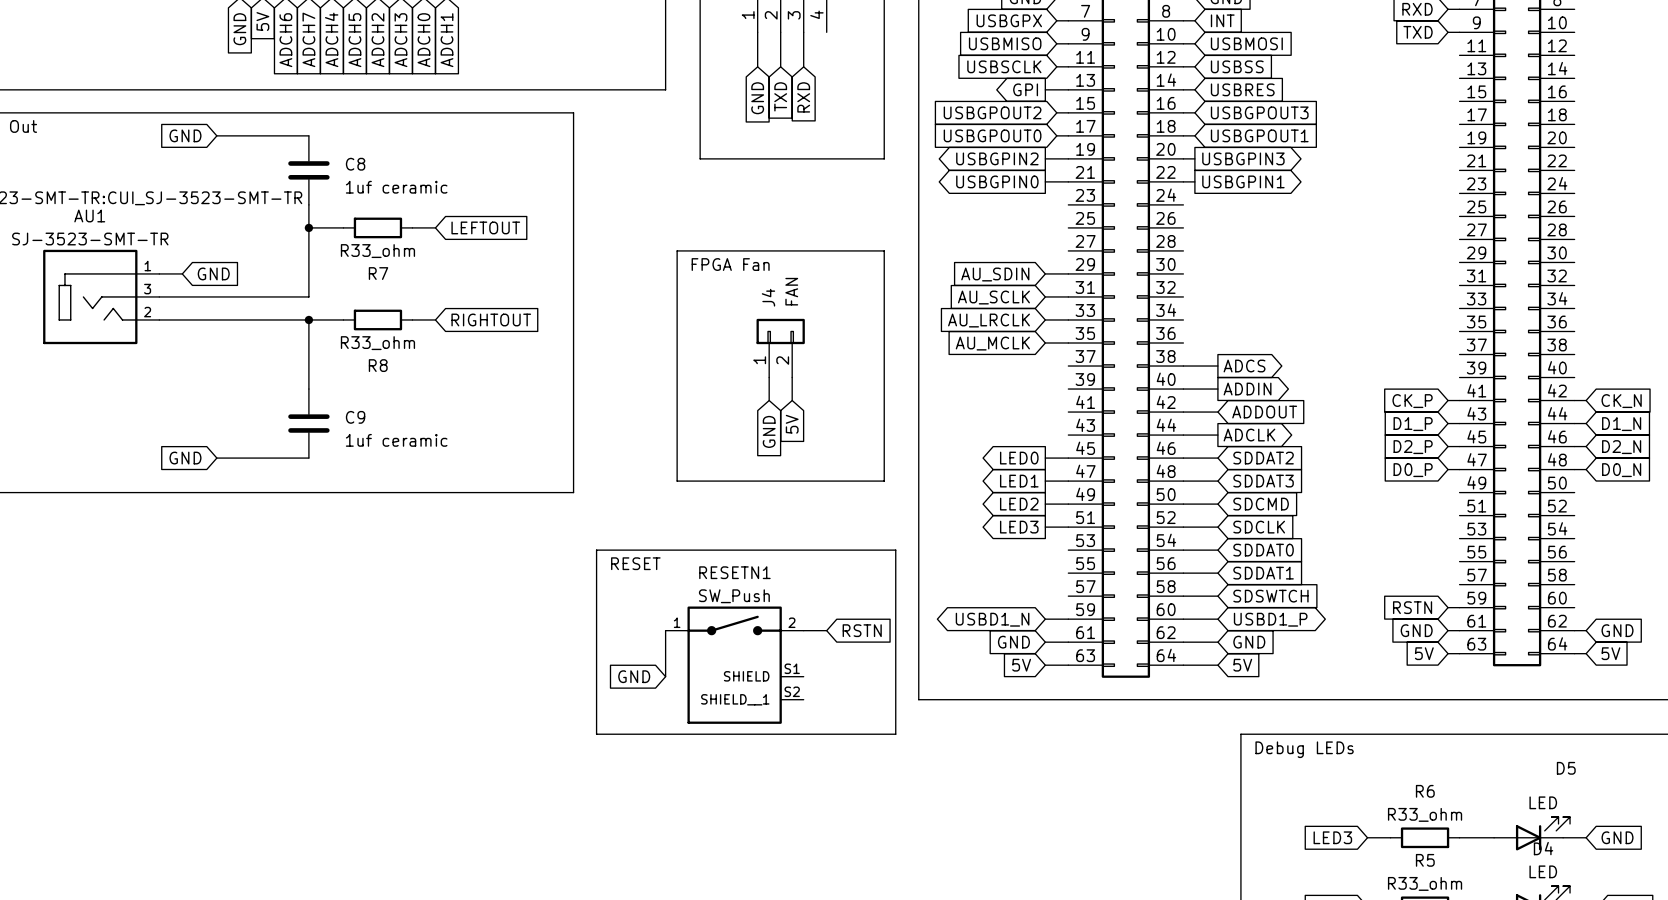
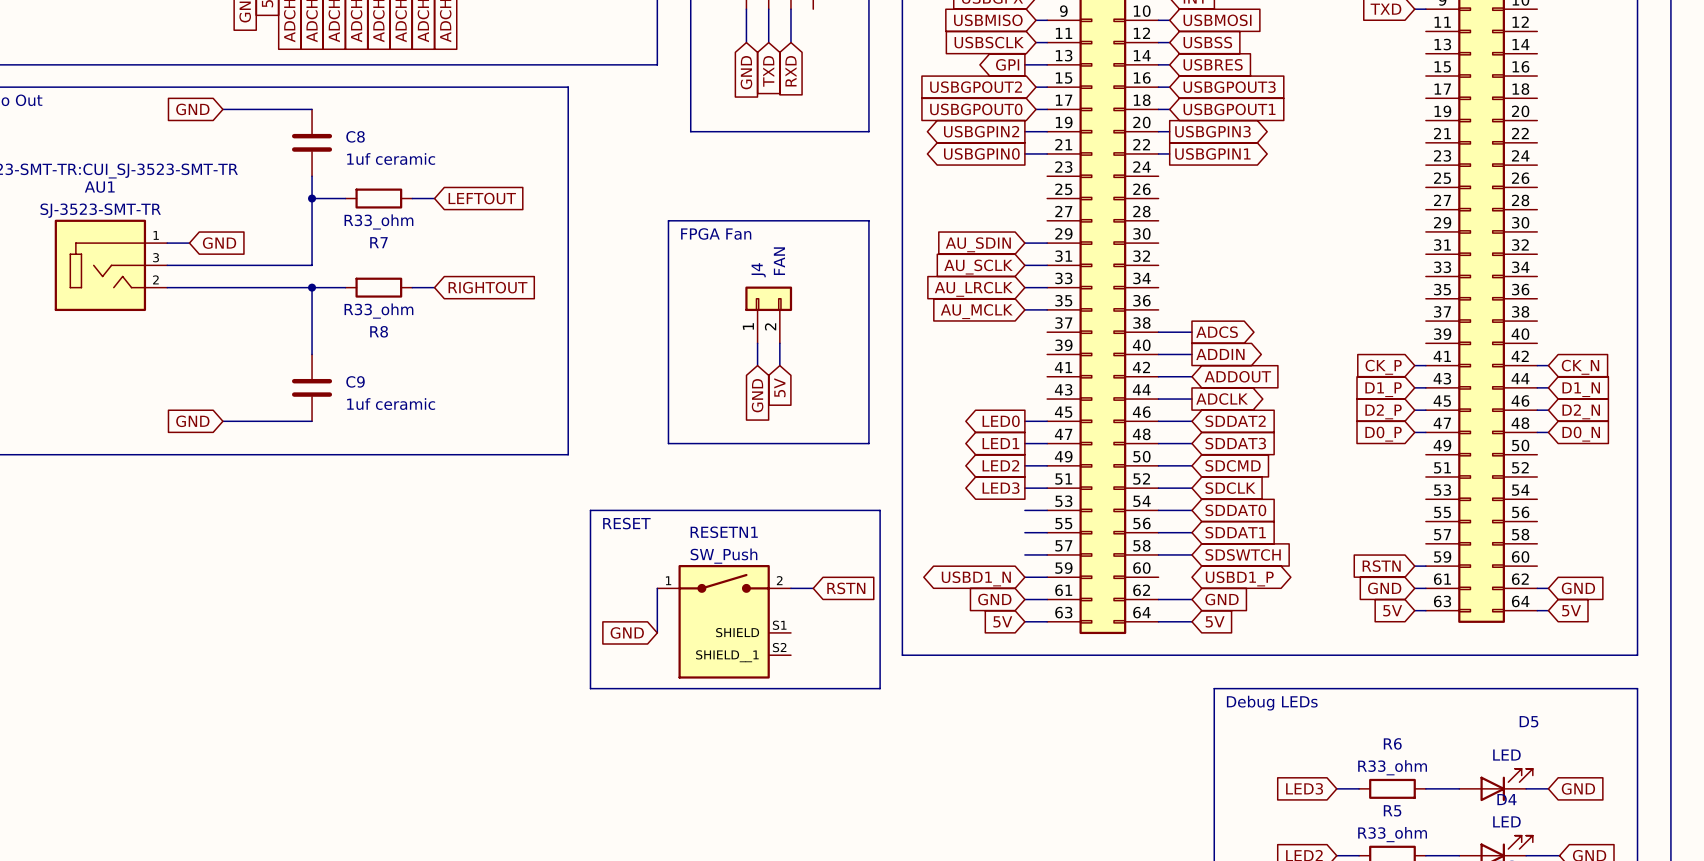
wire: none -> (1024, 510) (1047, 510)
wire: none -> (1024, 532) (1047, 532)
wire: none -> (1024, 554) (1047, 554)
wire: (1183, 619) (1217, 619) -> none

